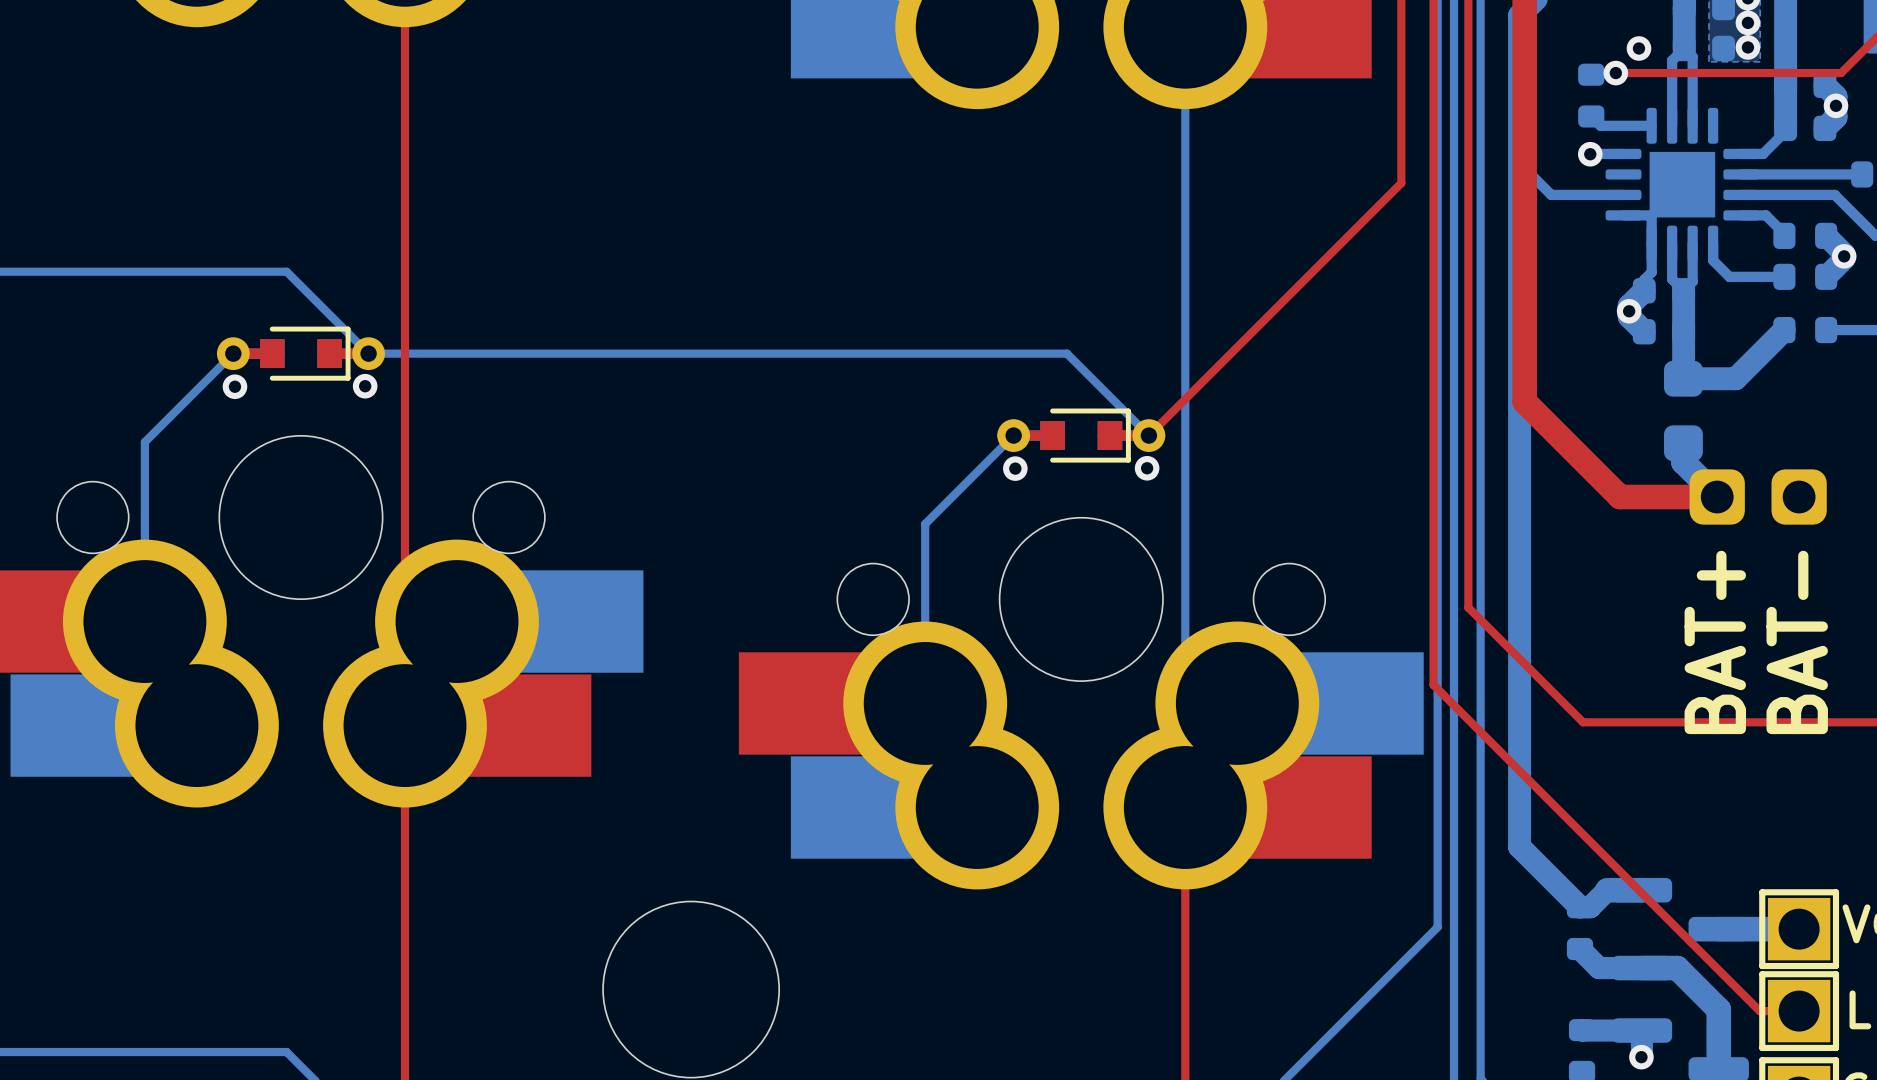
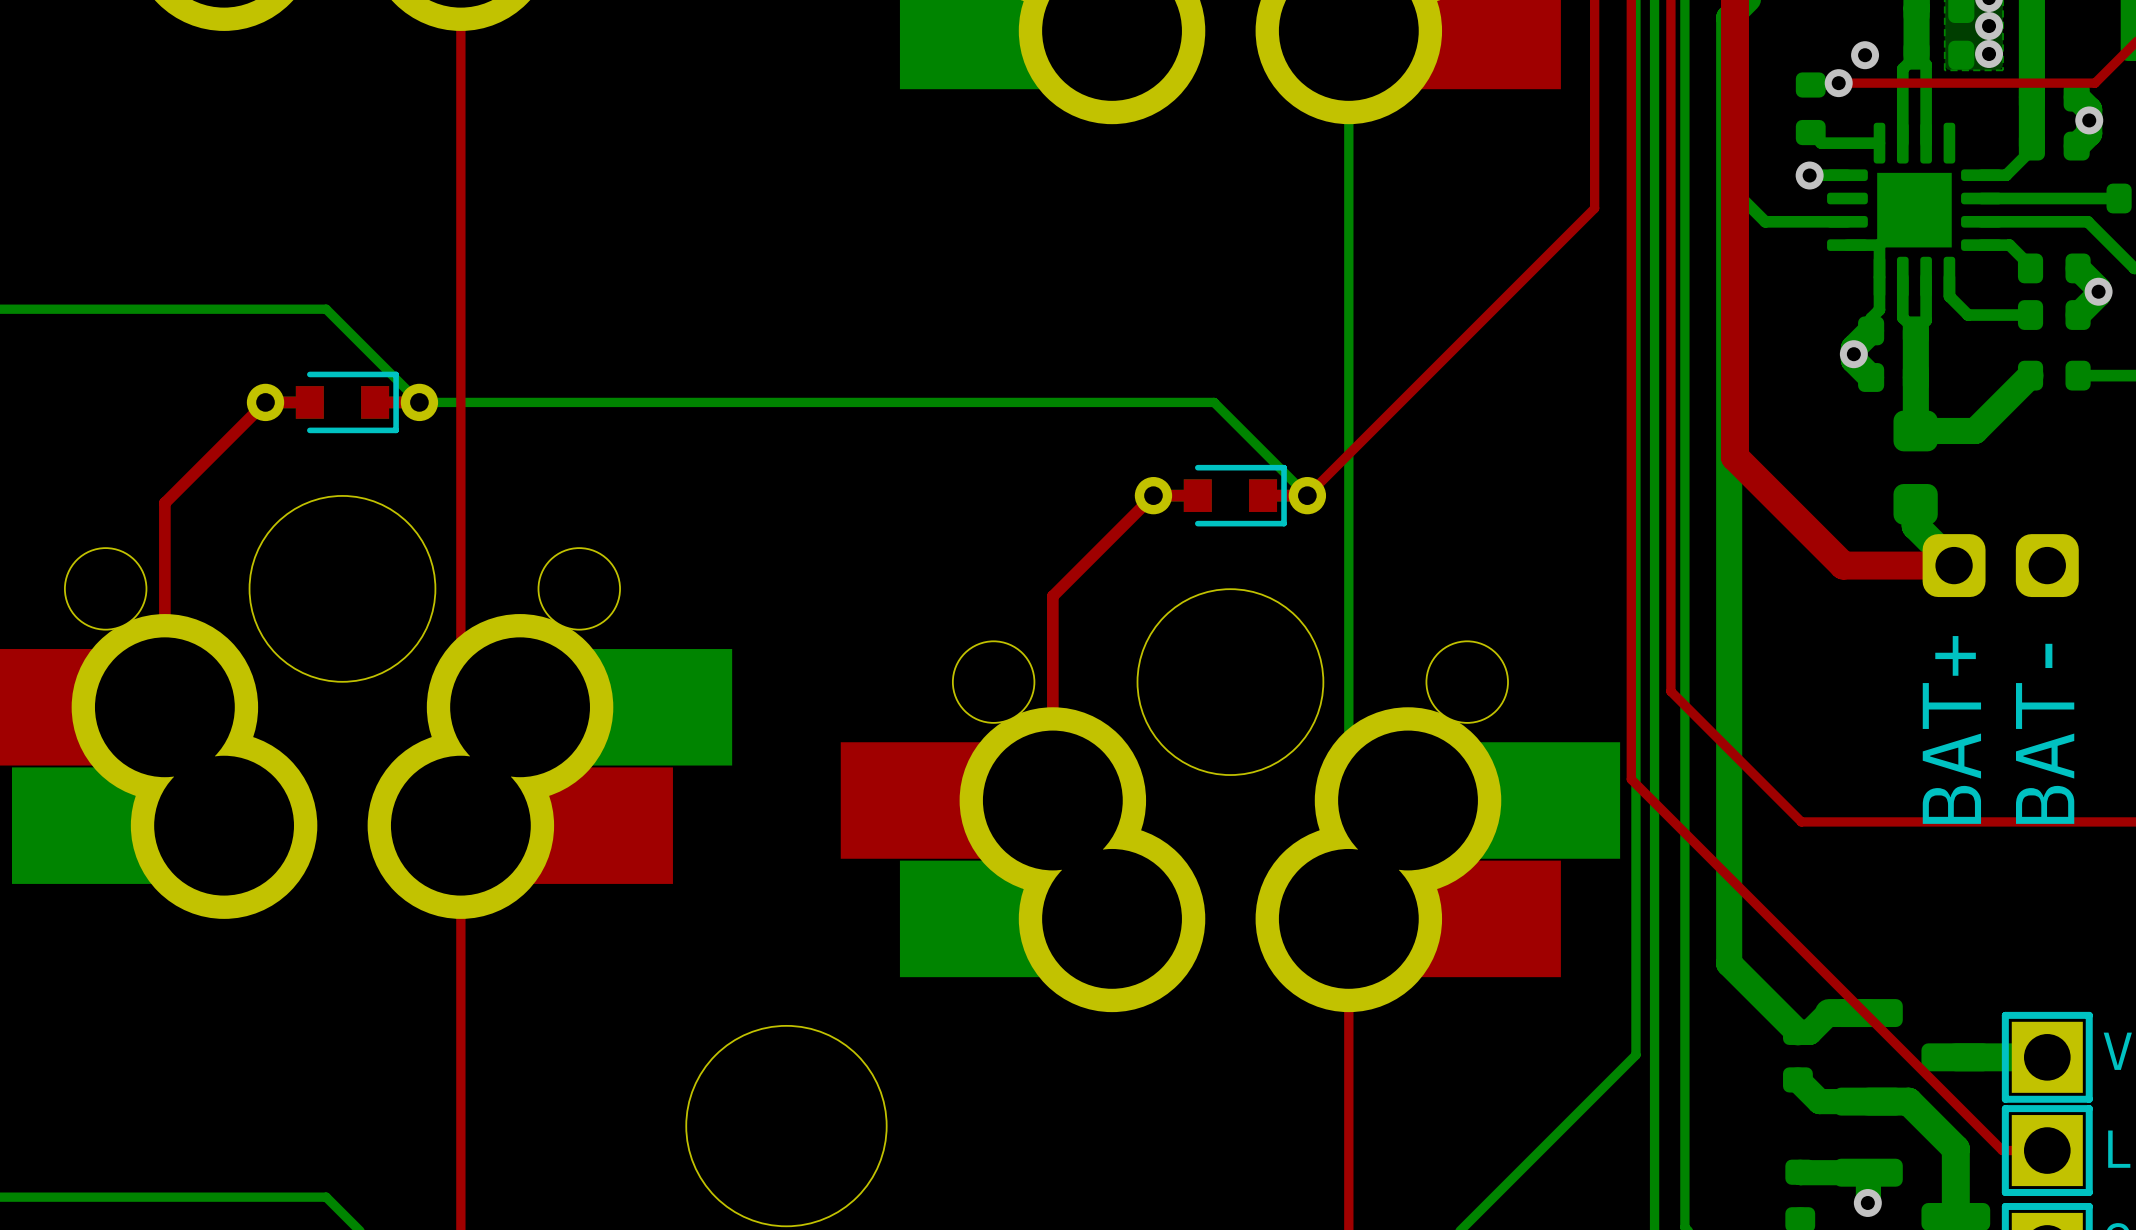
bottom track: (233, 353) (144, 442) (144, 621) -> none
top track: none -> (265, 402) (164, 503) (164, 707)
via: (234, 386) -> none
via: (365, 386) -> none
bottom track: (1013, 435) (925, 524) (925, 703) -> none
top track: none -> (1153, 495) (1052, 596) (1052, 800)
via: (1015, 468) -> none
via: (1147, 468) -> none

